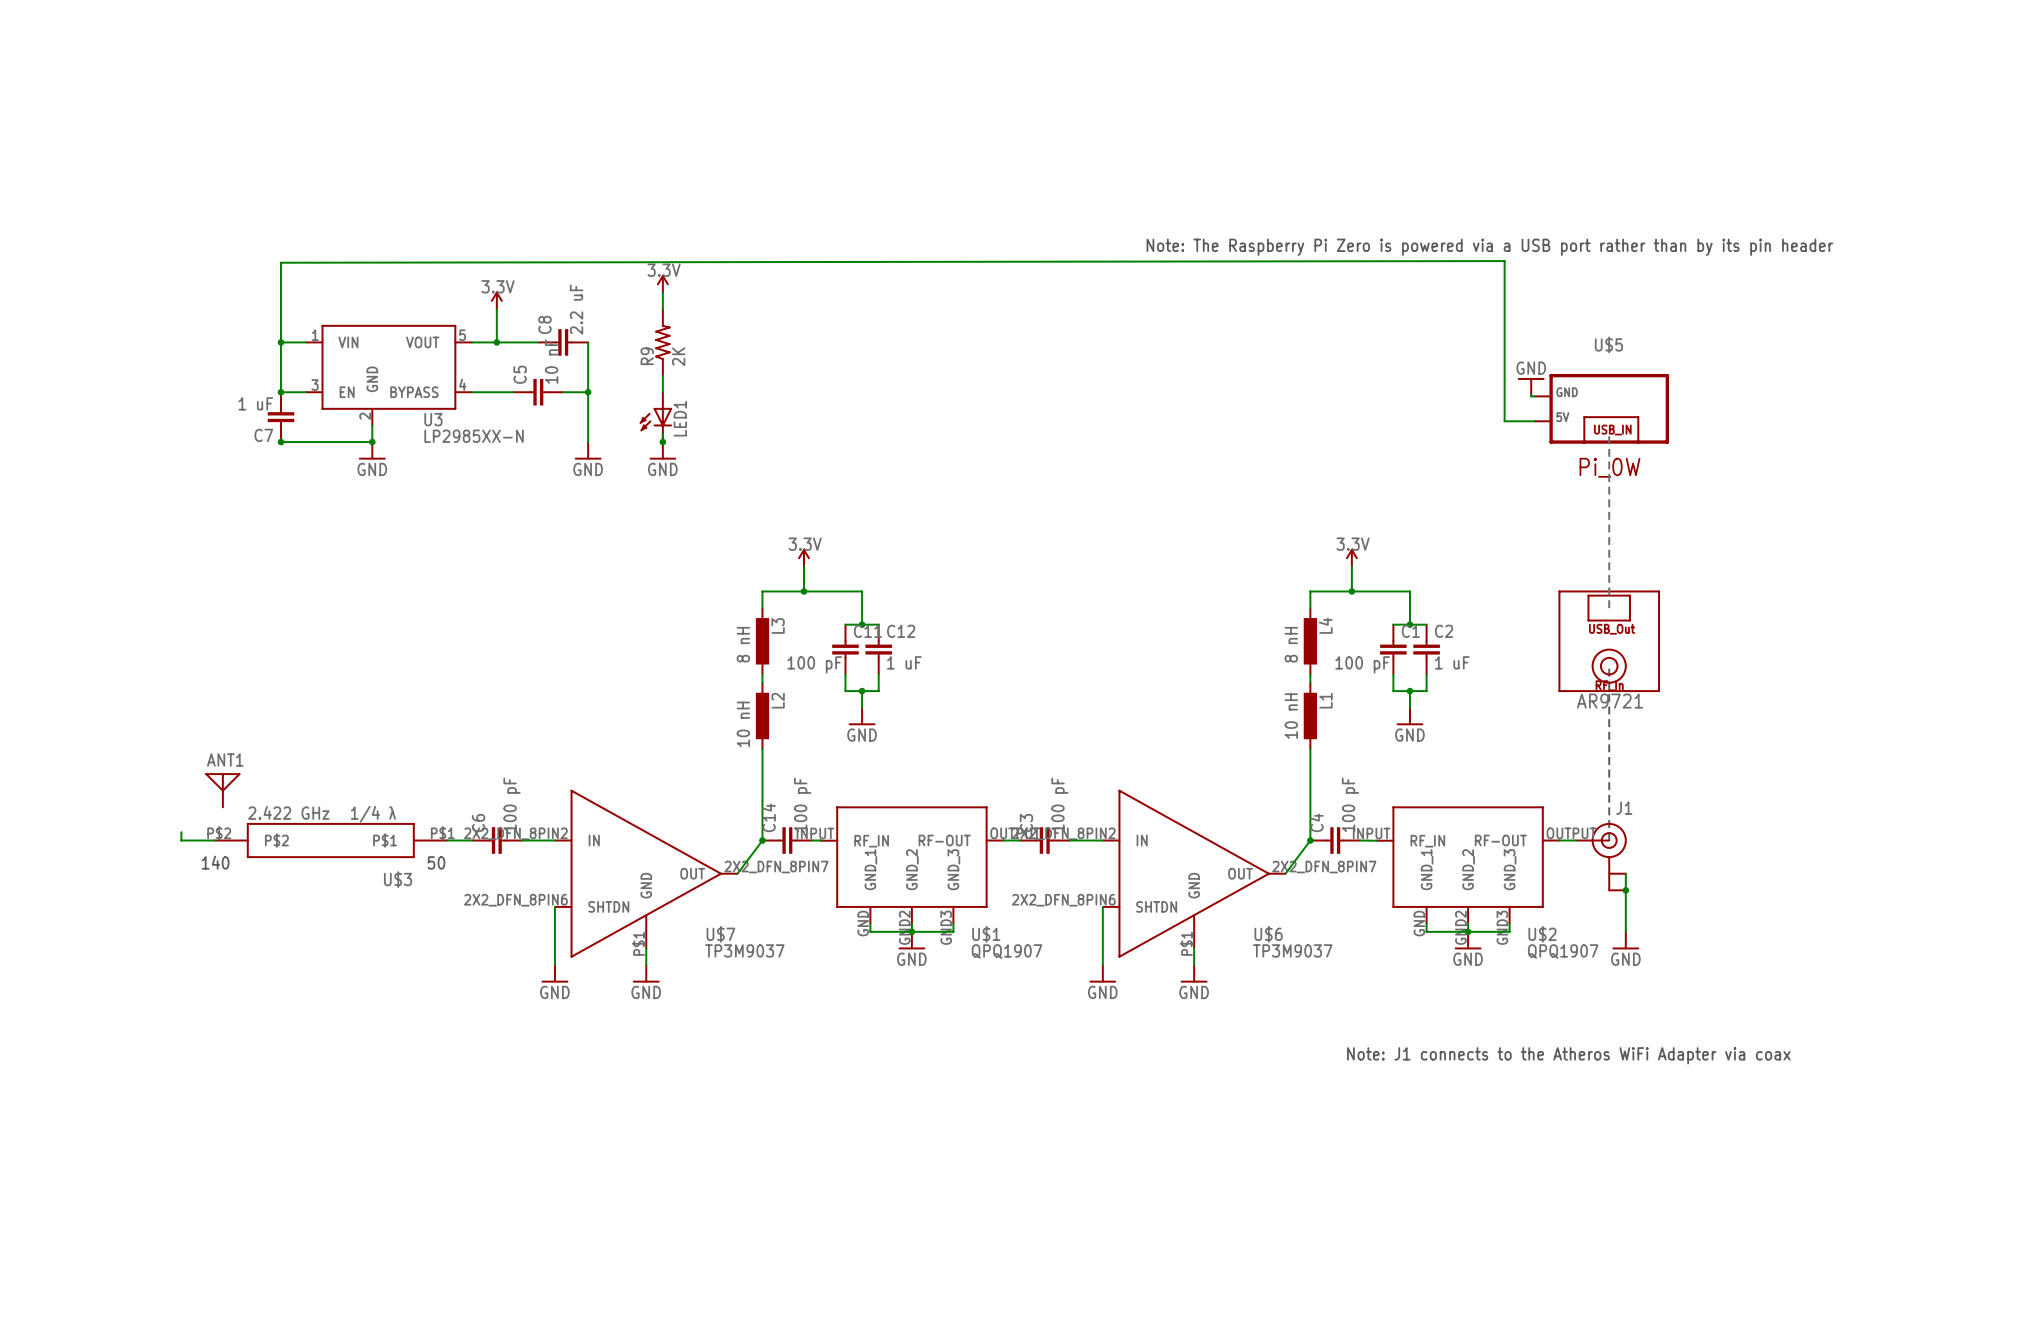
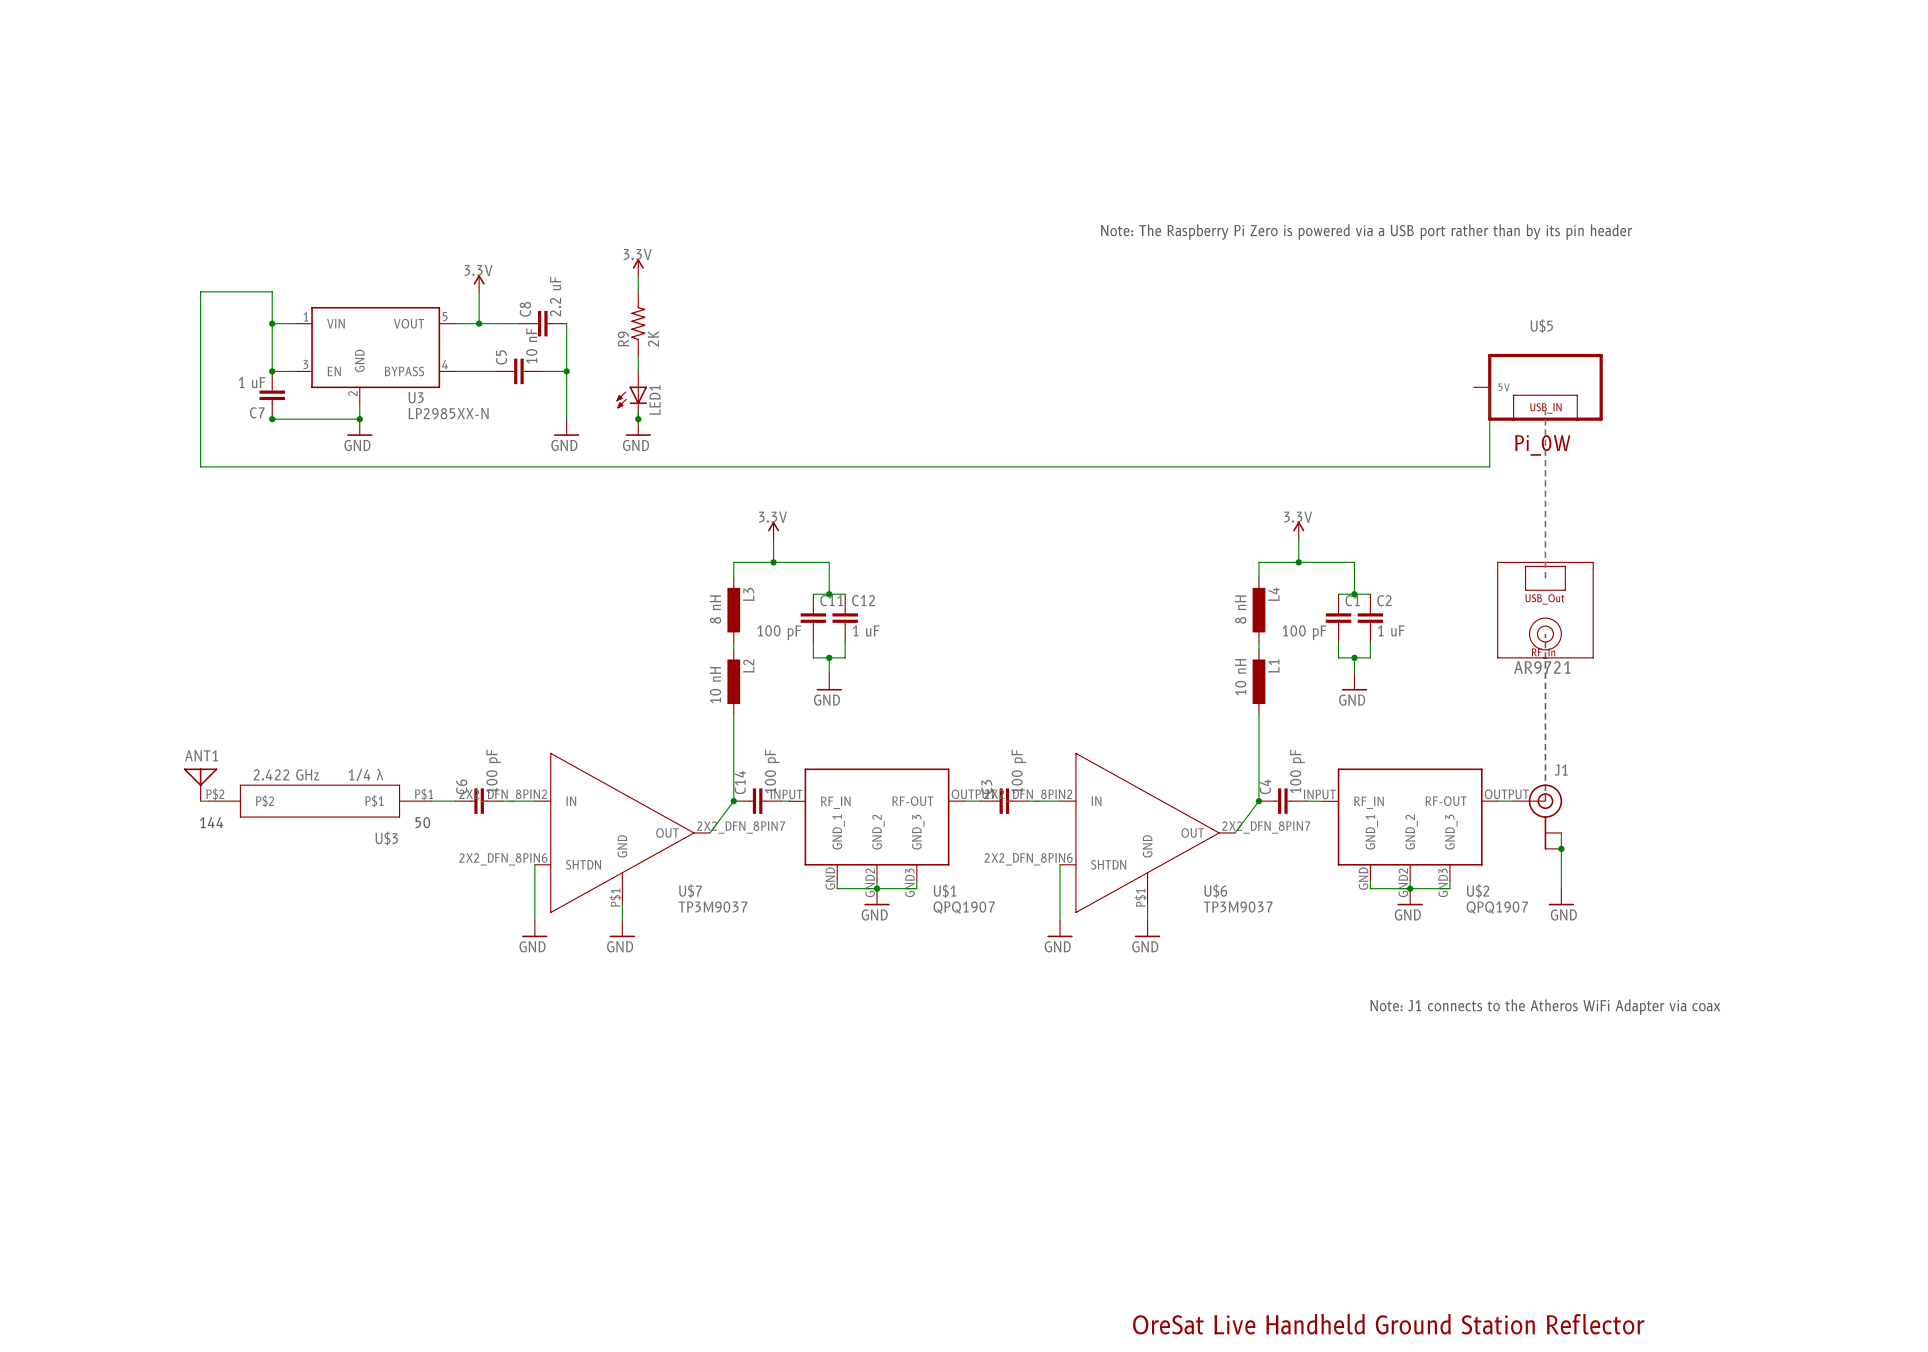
wire: (281, 309) (281, 262) (1504, 261) (1504, 421) (1534, 421) -> (272, 291) (200, 291) (200, 466) (1489, 466) (1489, 387)
U$5 symbol: [1534, 373, 1669, 444] -> [1473, 353, 1603, 421]
power symbol: GND (1531, 386) -> none
wire: (1531, 395) (1534, 396) -> none
ANT1 position: (222, 790) -> (200, 784)
wire: (181, 832) (181, 840) (206, 840) -> none
U$3 text: 140 (215, 862) -> 144 (211, 822)

